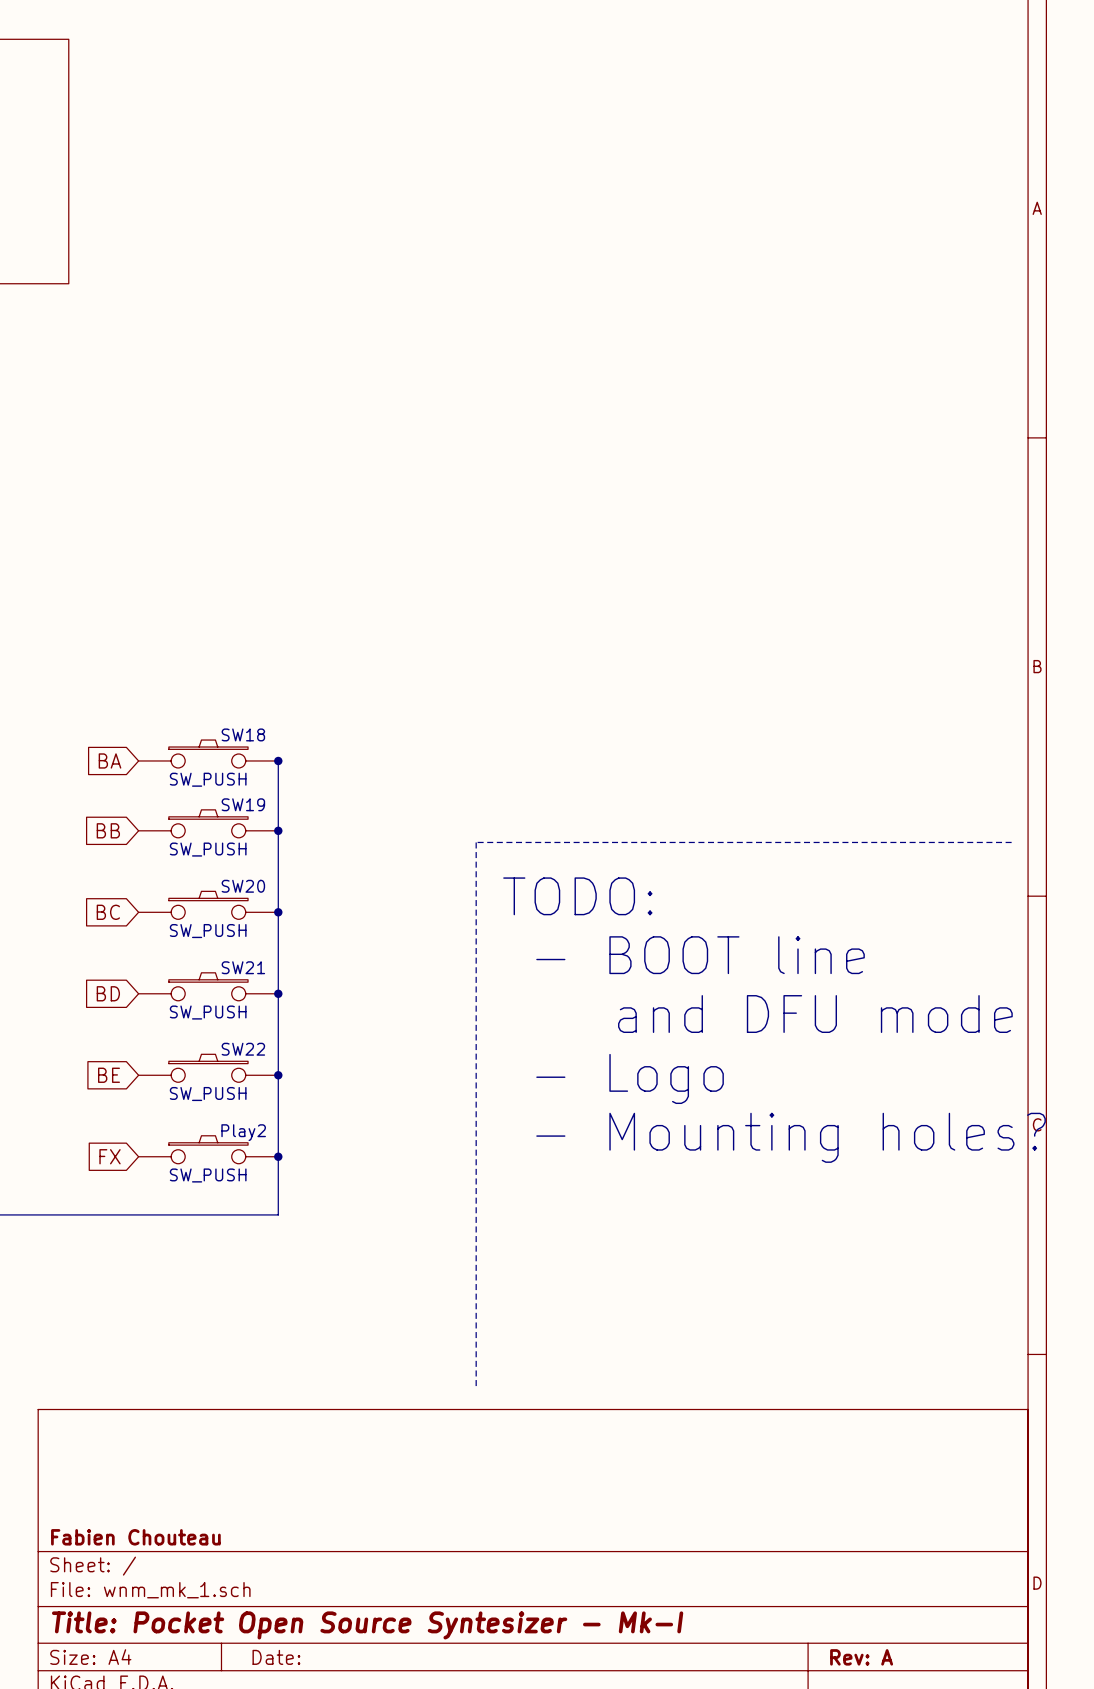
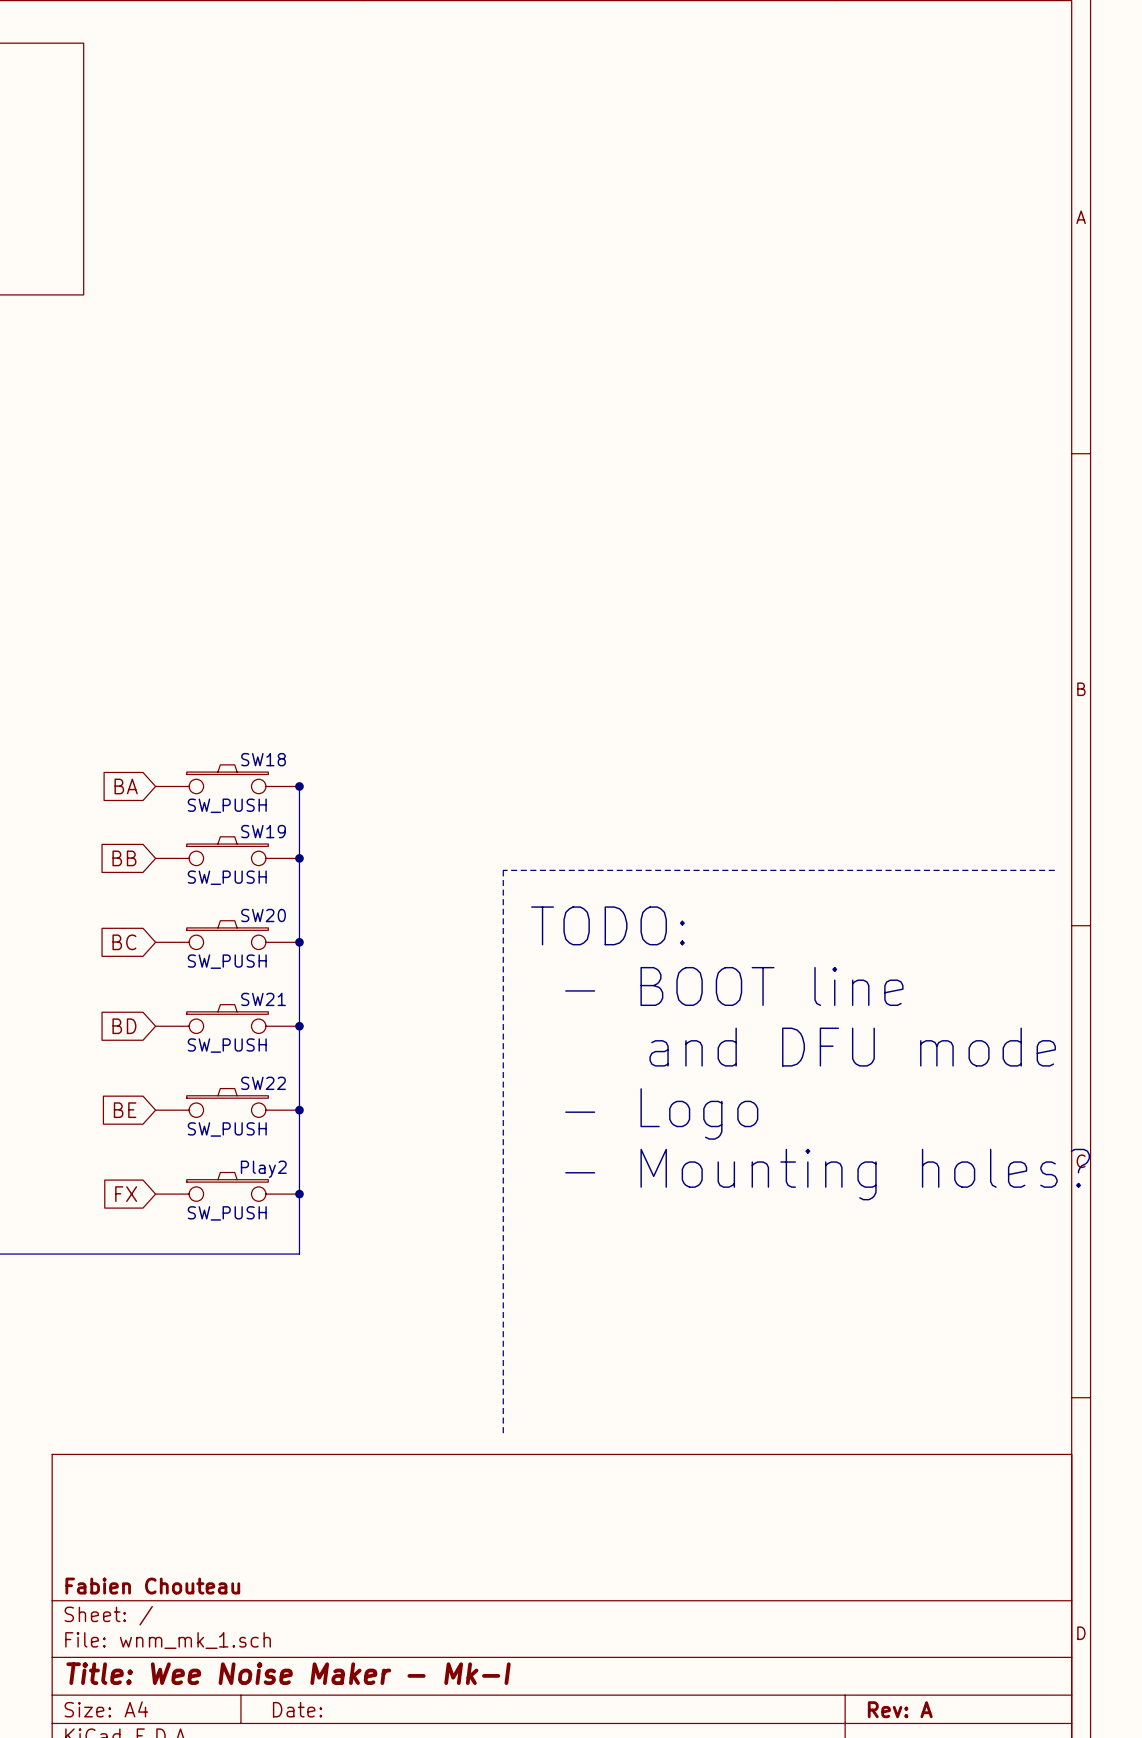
title block: Title: Pocket Open Source Syntesizer - Mk-I (367, 1625) -> Title: Wee Noise Maker - Mk-I (288, 1673)

